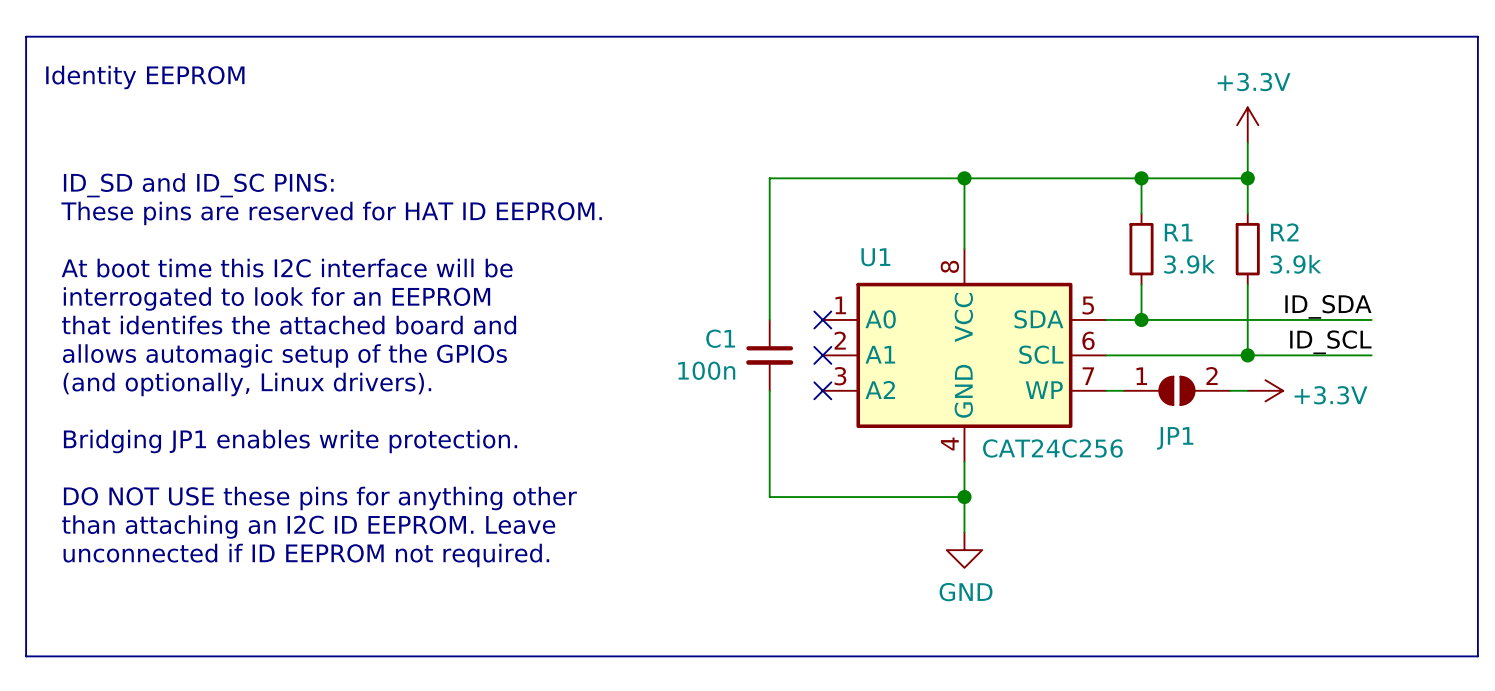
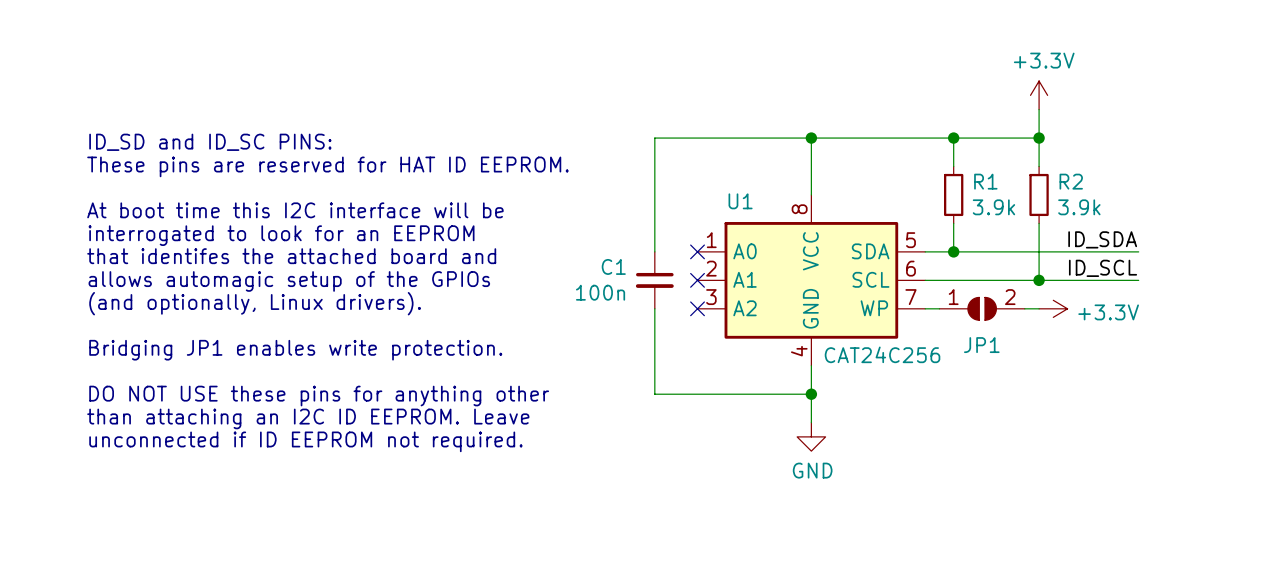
line: (26, 36) (26, 656) (1477, 656) (1477, 36) (26, 36) -> none
text: Identity EEPROM (145, 77) -> none

